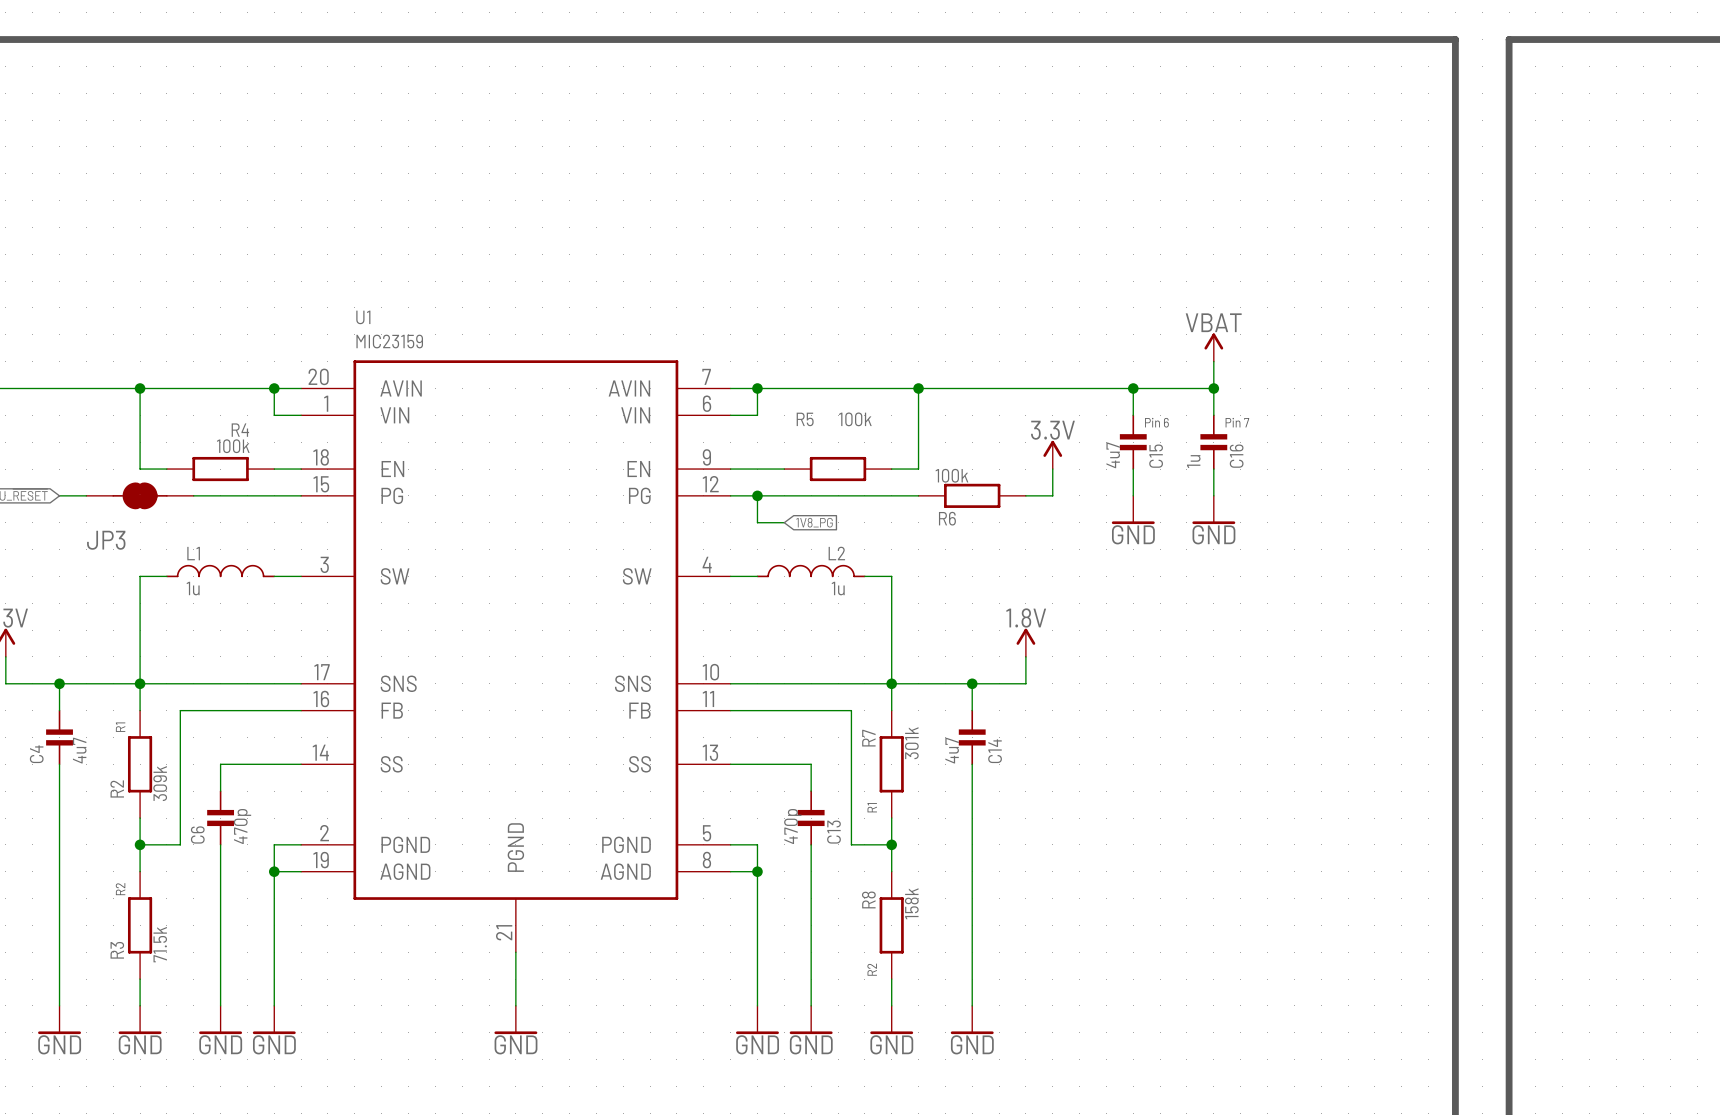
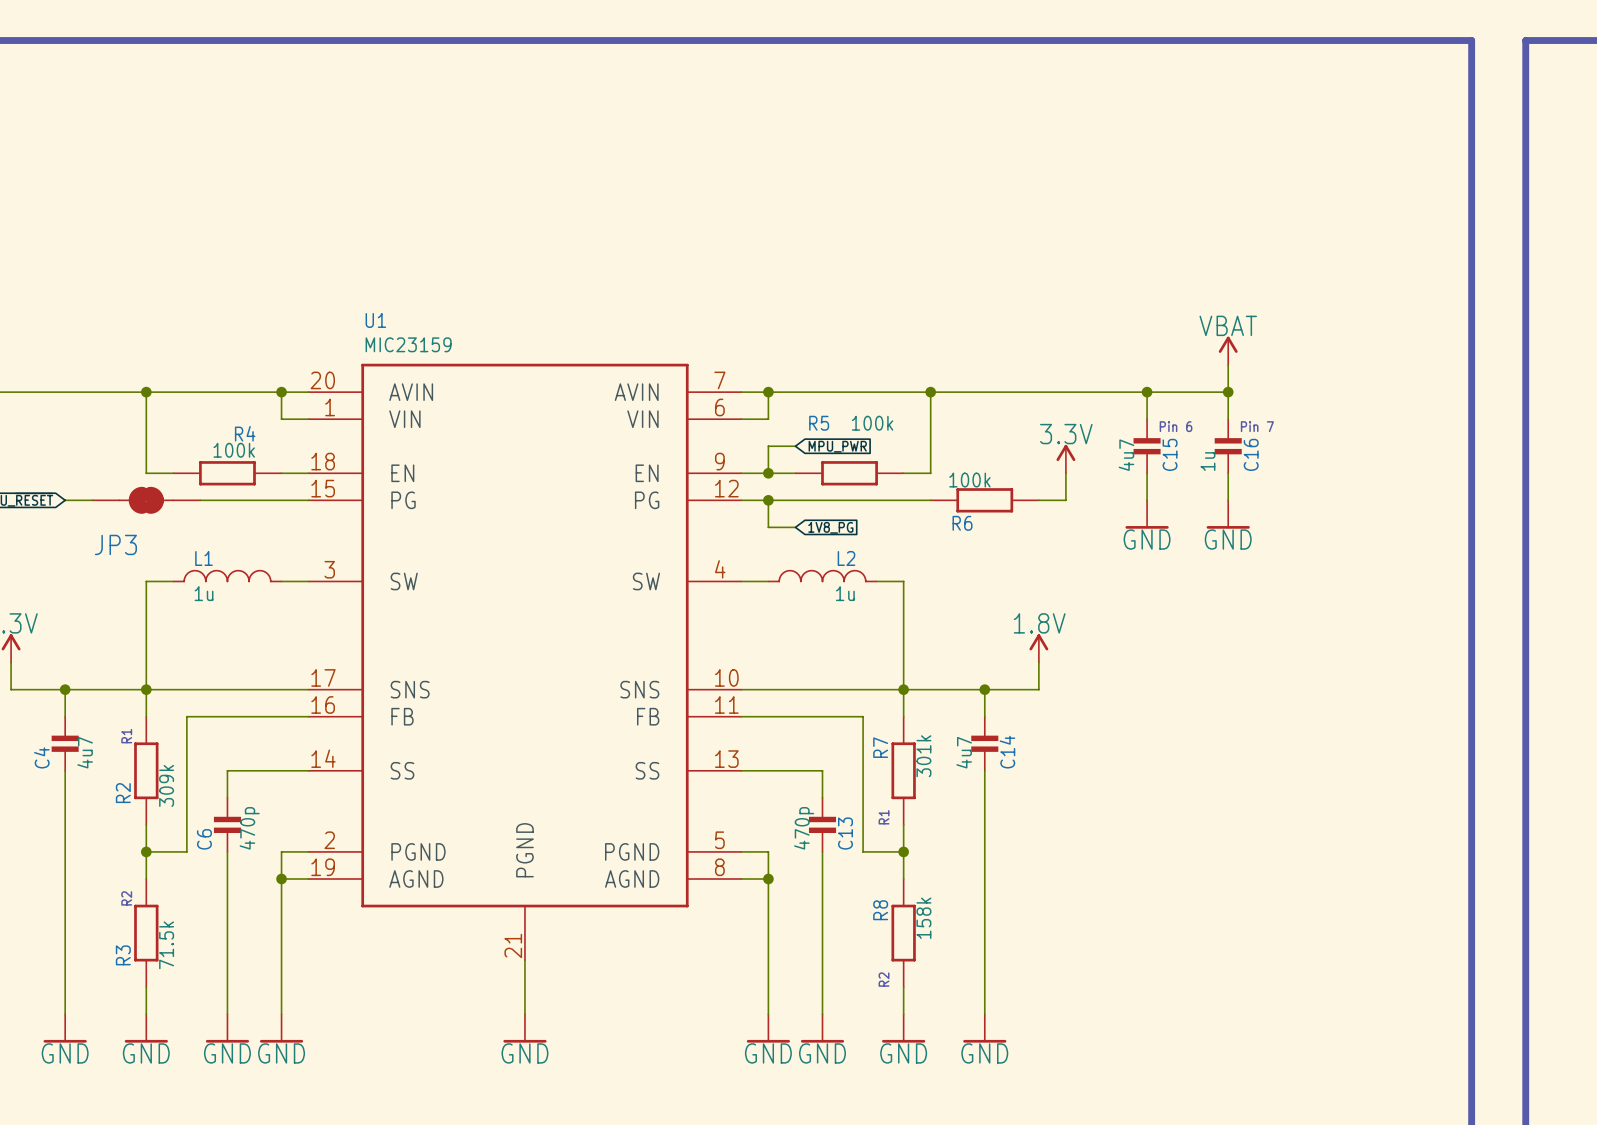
wire: none -> (795, 446) (768, 446) (768, 473)
global label: none -> MPU_PWR (837, 446)
junction: none -> (768, 473)

